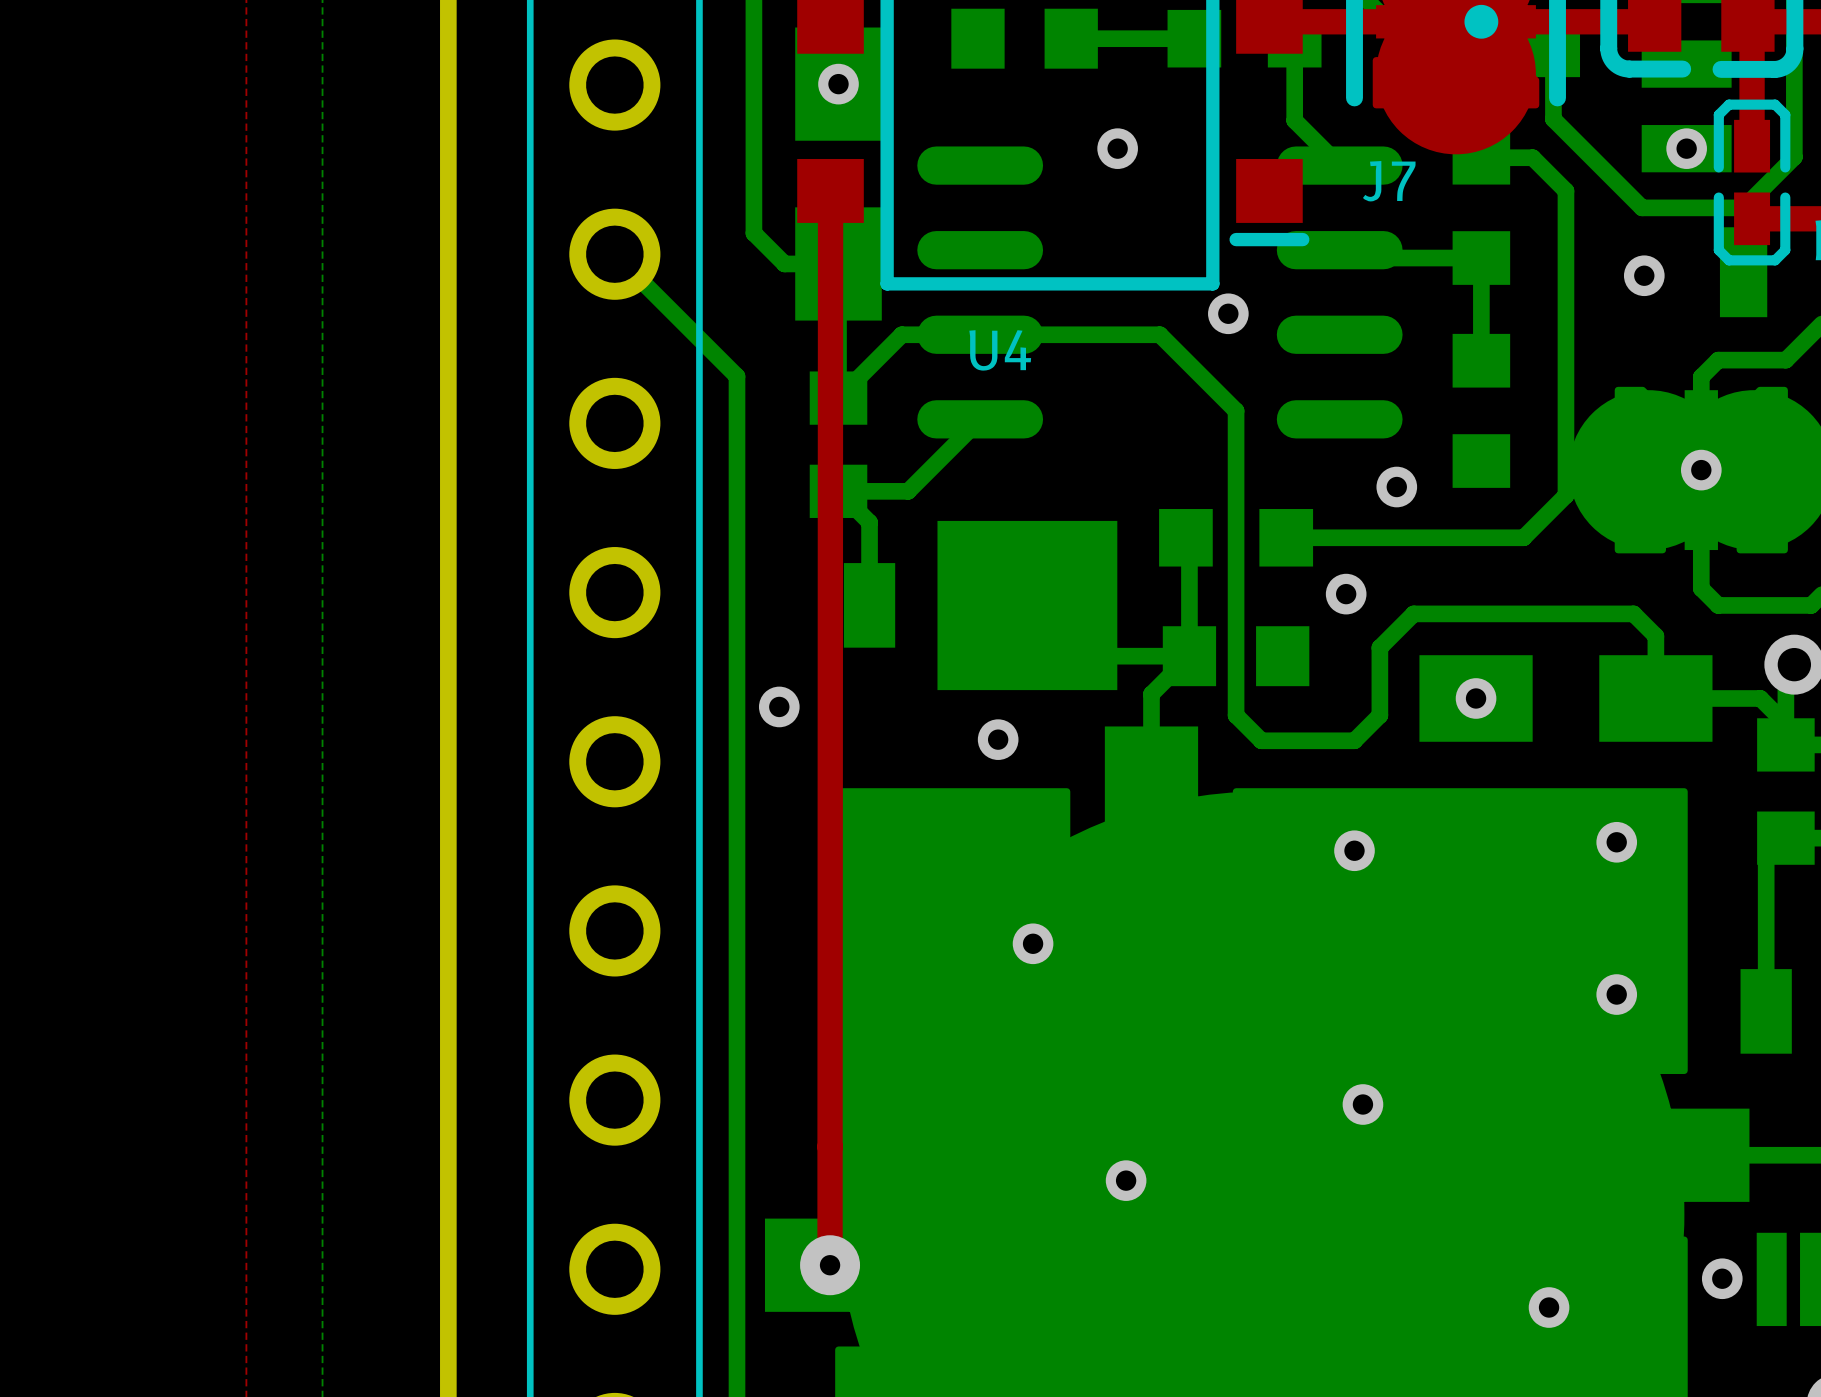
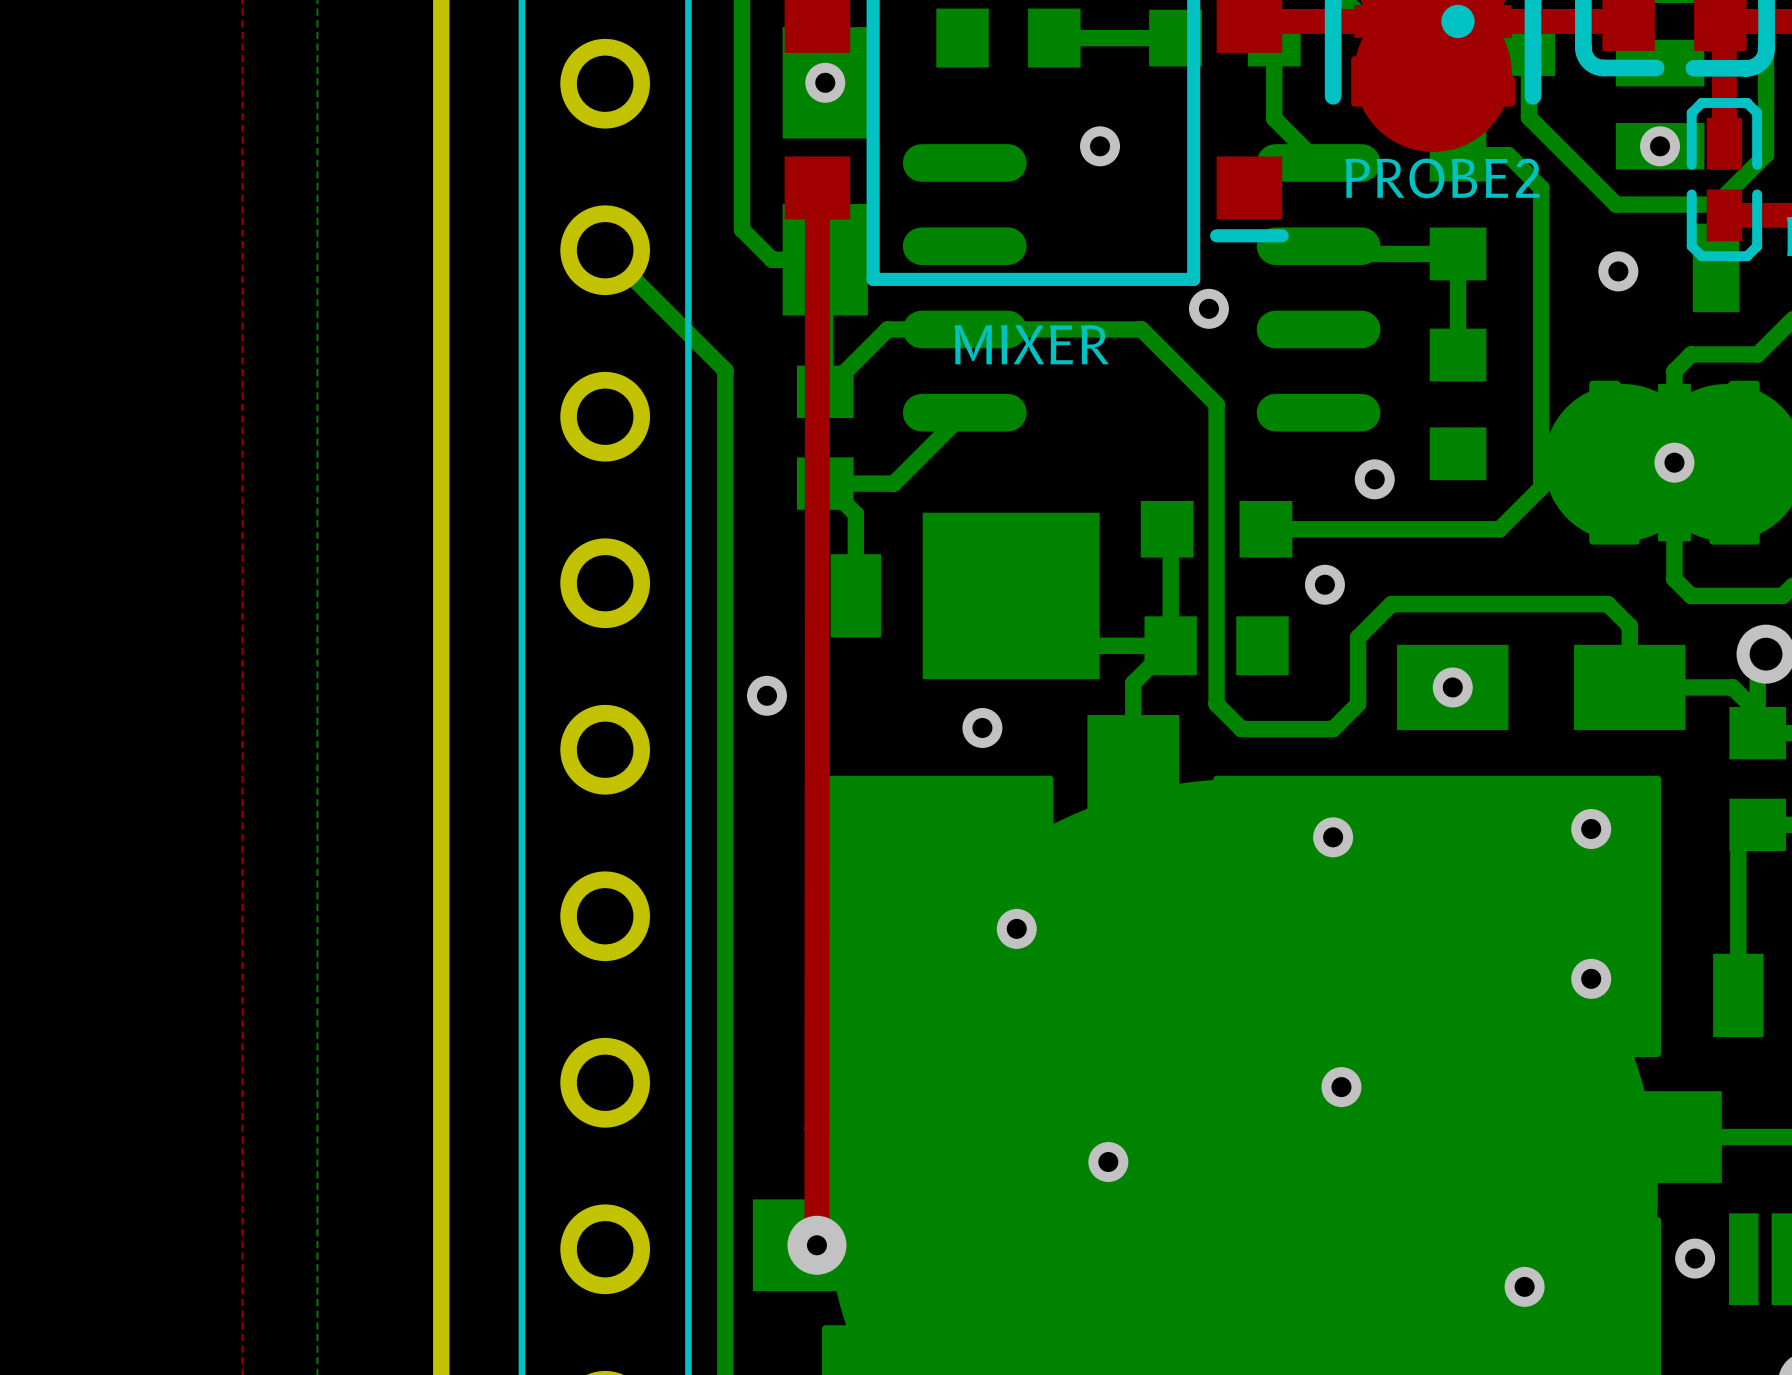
J7 name: J7 (1389, 181) -> PROBE2 (1442, 178)
U4 name: U4 (1000, 350) -> MIXER (1031, 344)

